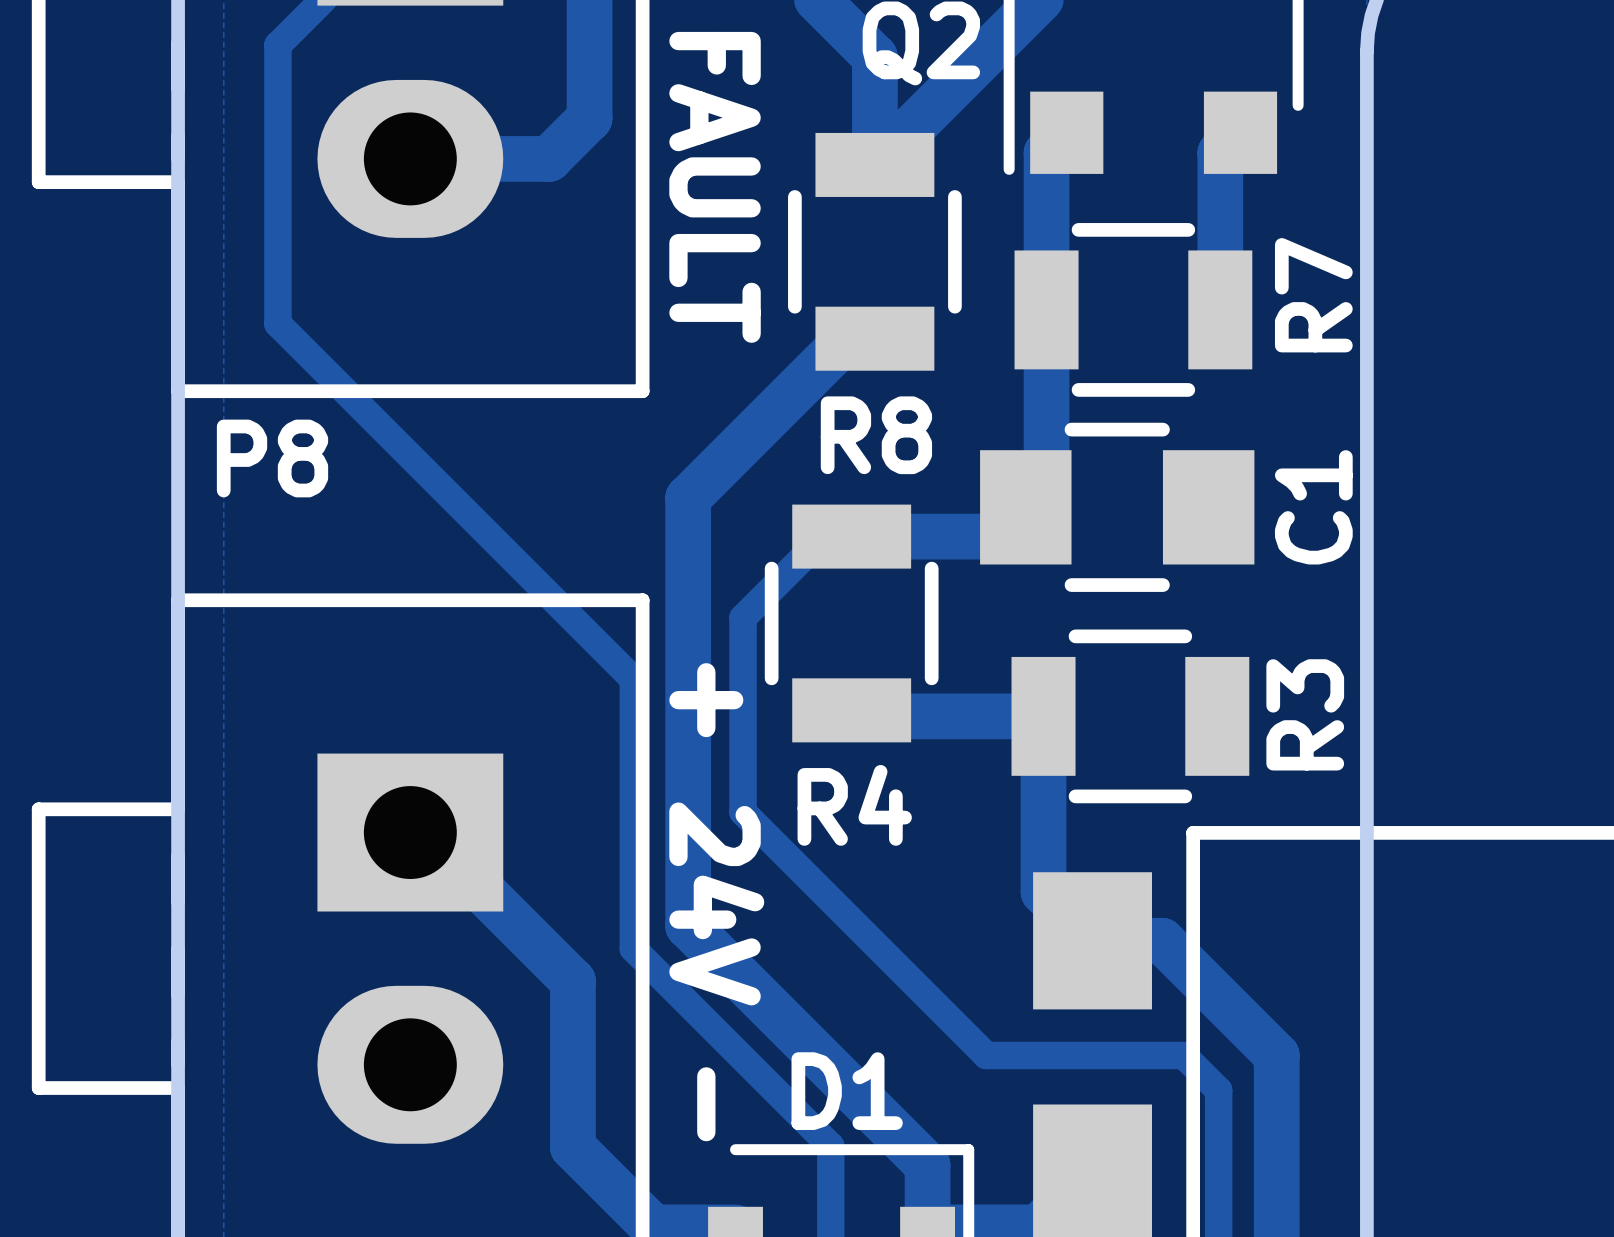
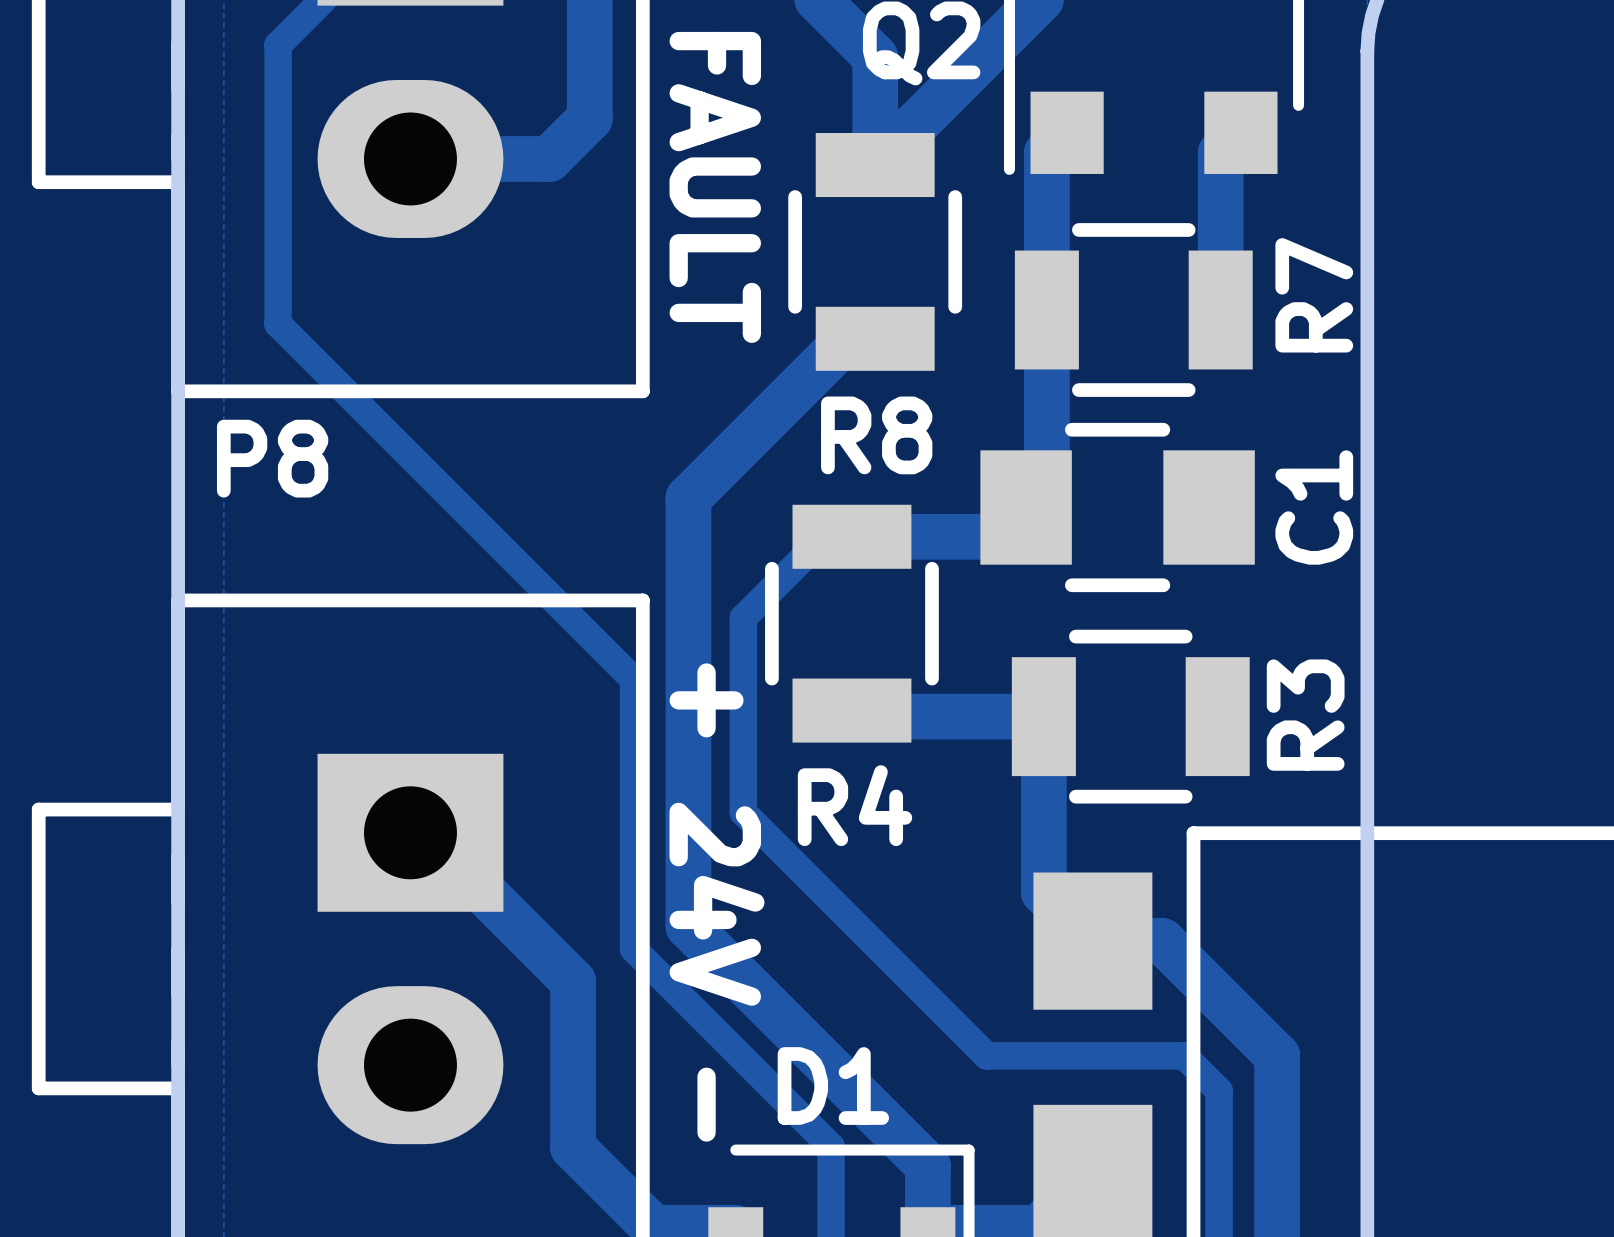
D1 name position: D1 (847, 1091) -> D1 (833, 1085)

